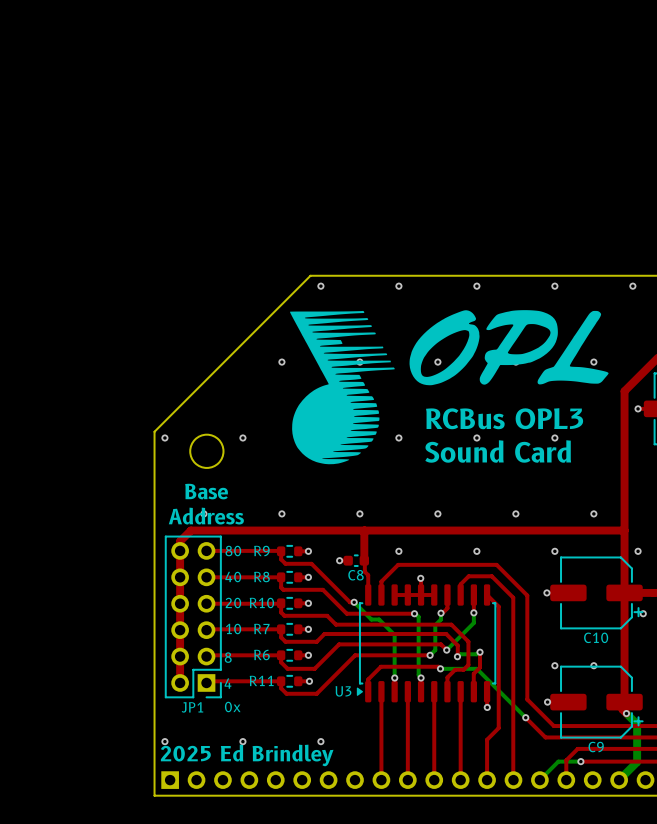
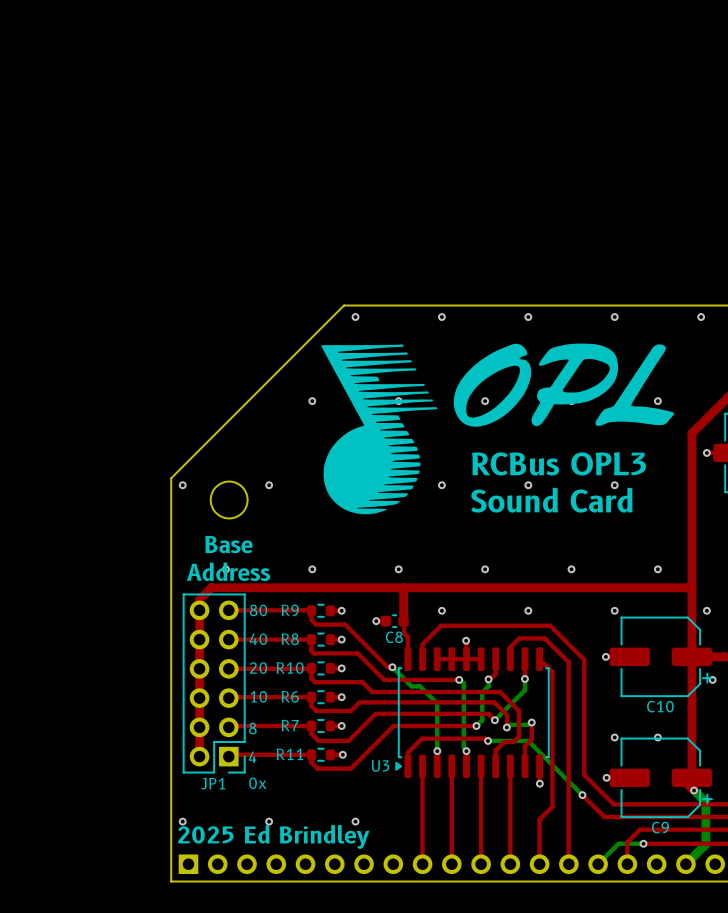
R7 name: R7 (261, 628) -> R6 (290, 696)
R6 name: R6 (261, 654) -> R7 (290, 725)

